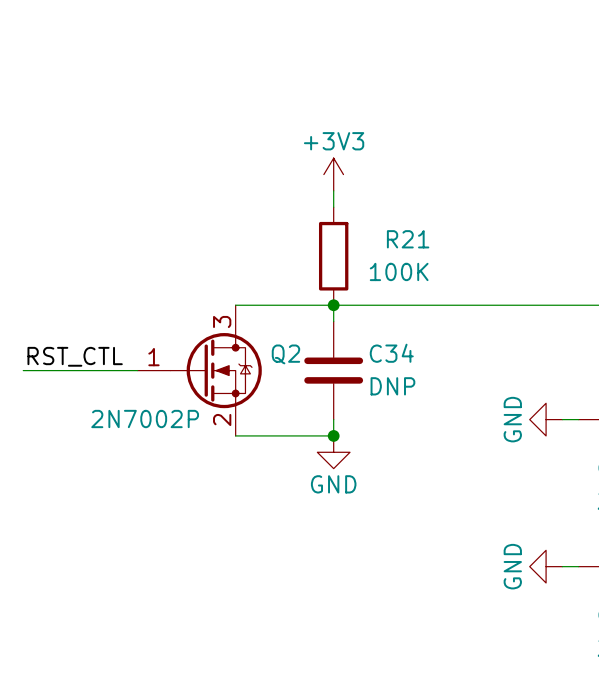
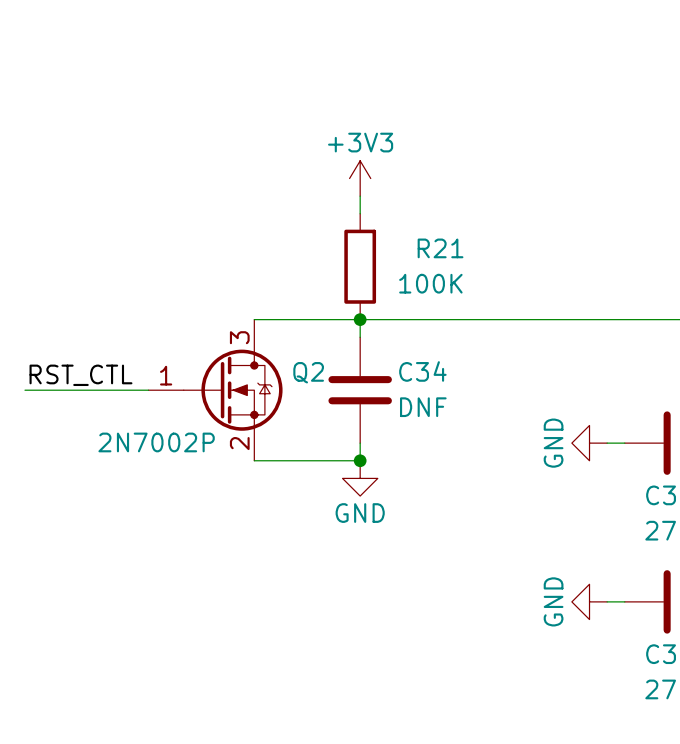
C34 value: DNP (392, 386) -> DNF (423, 407)

